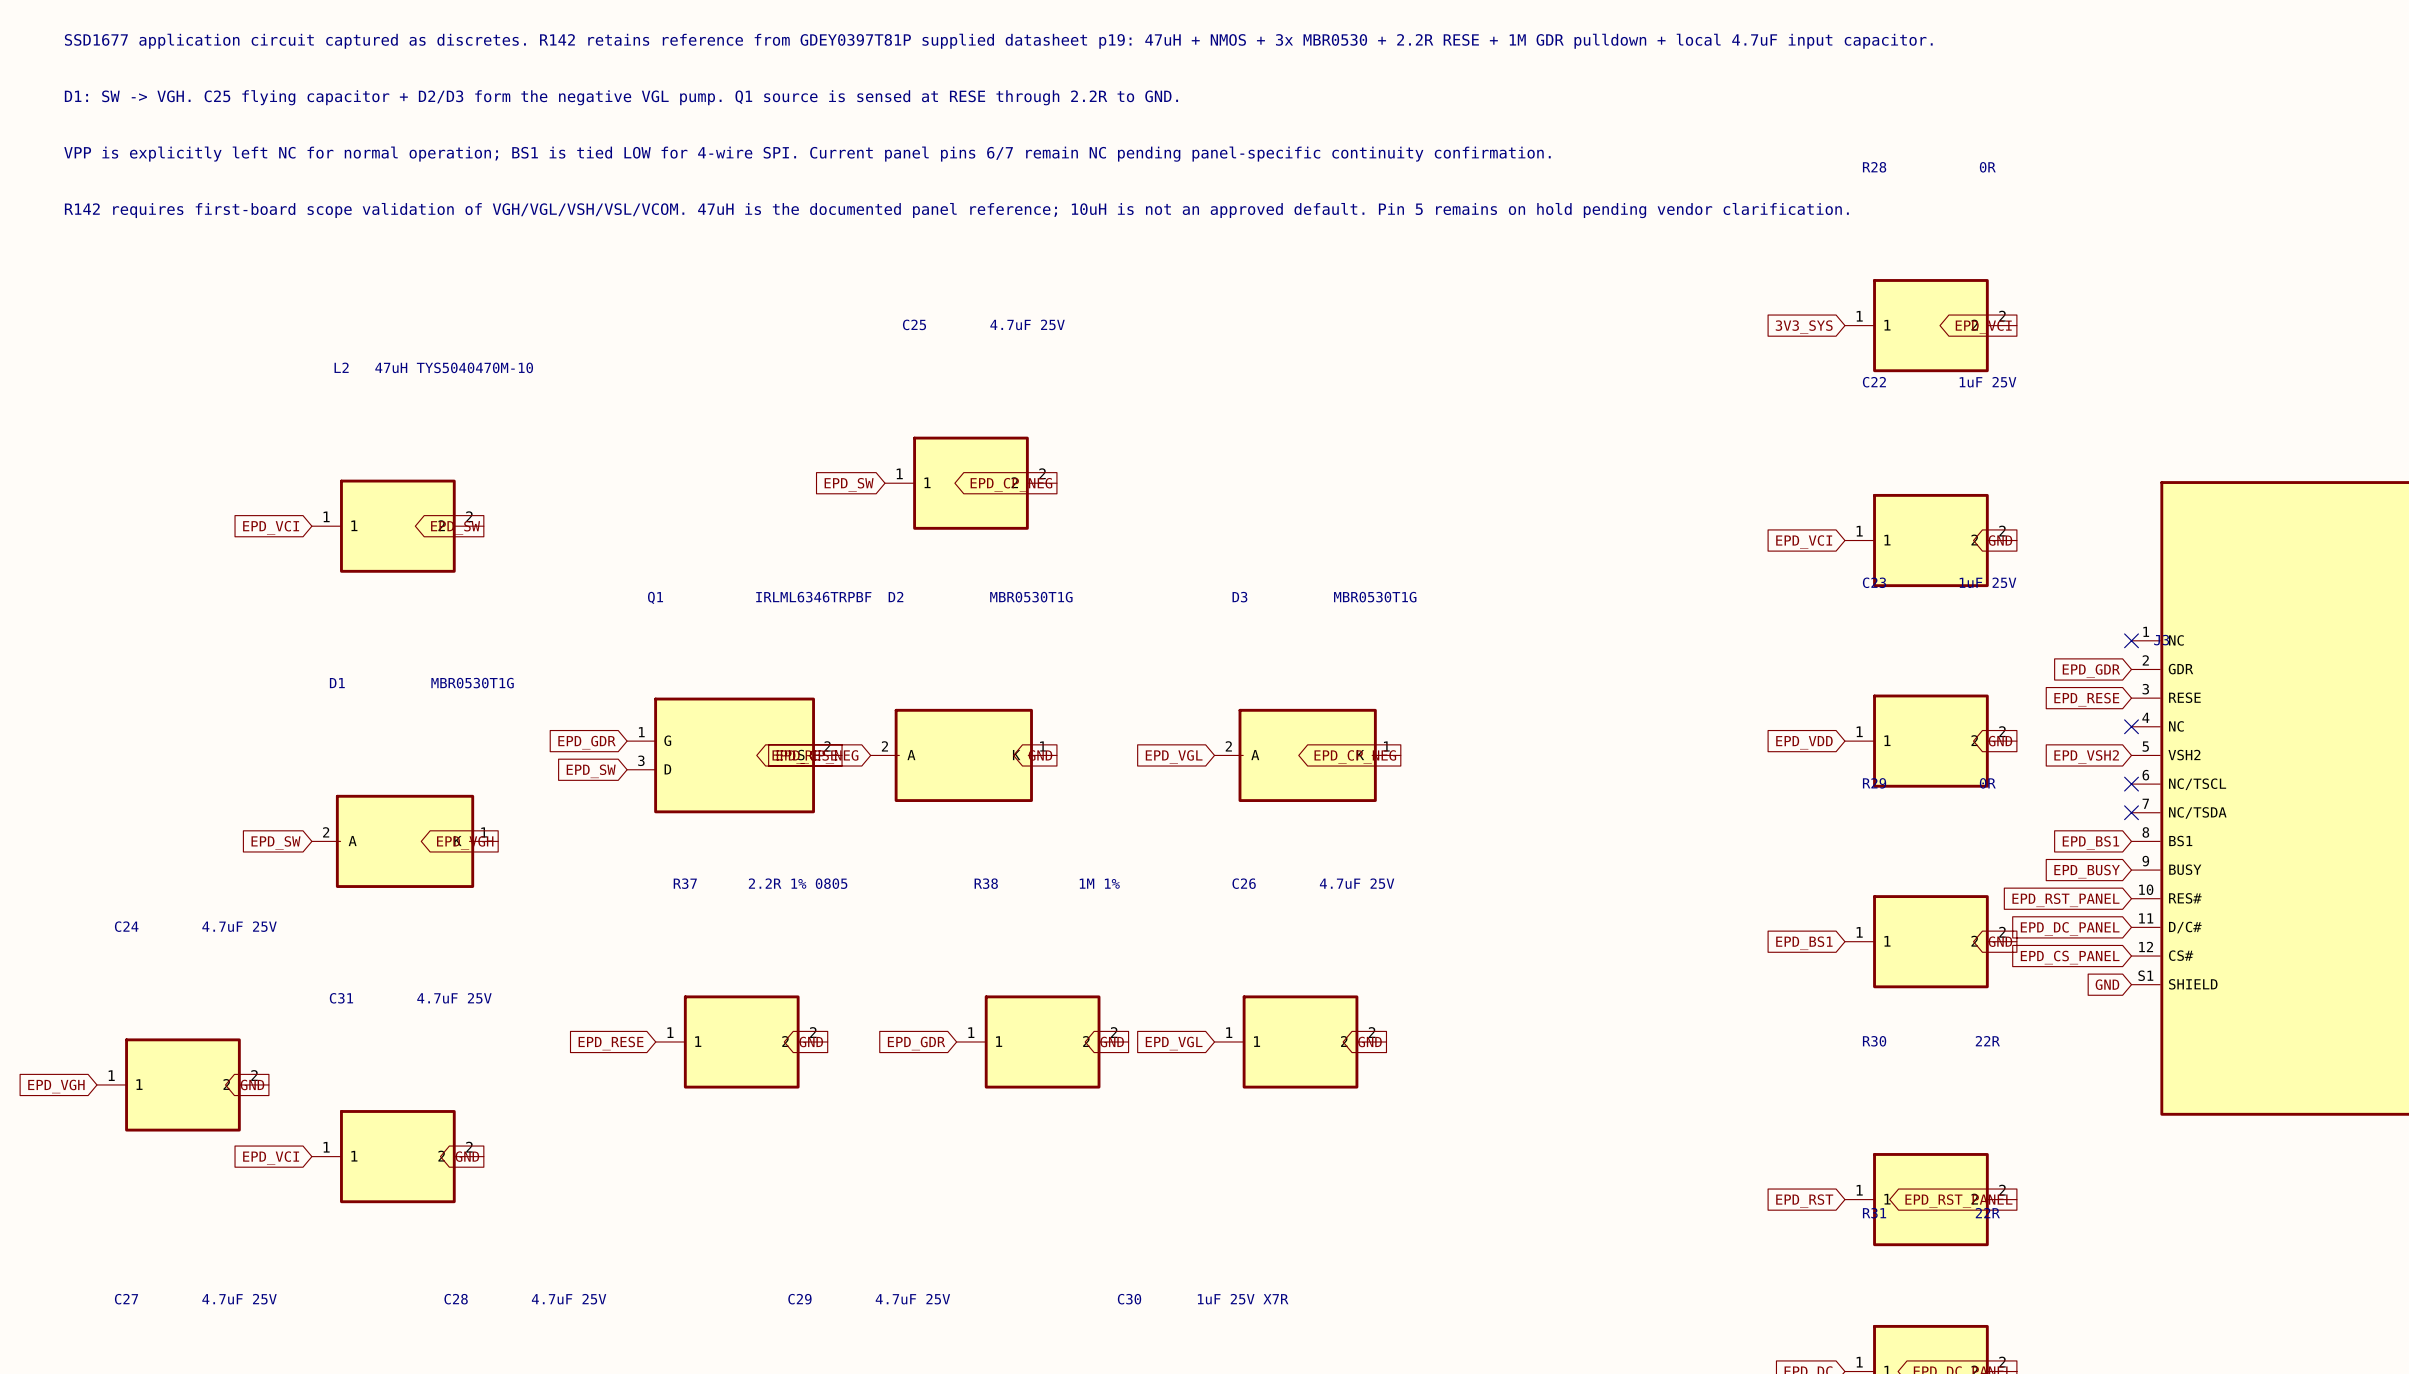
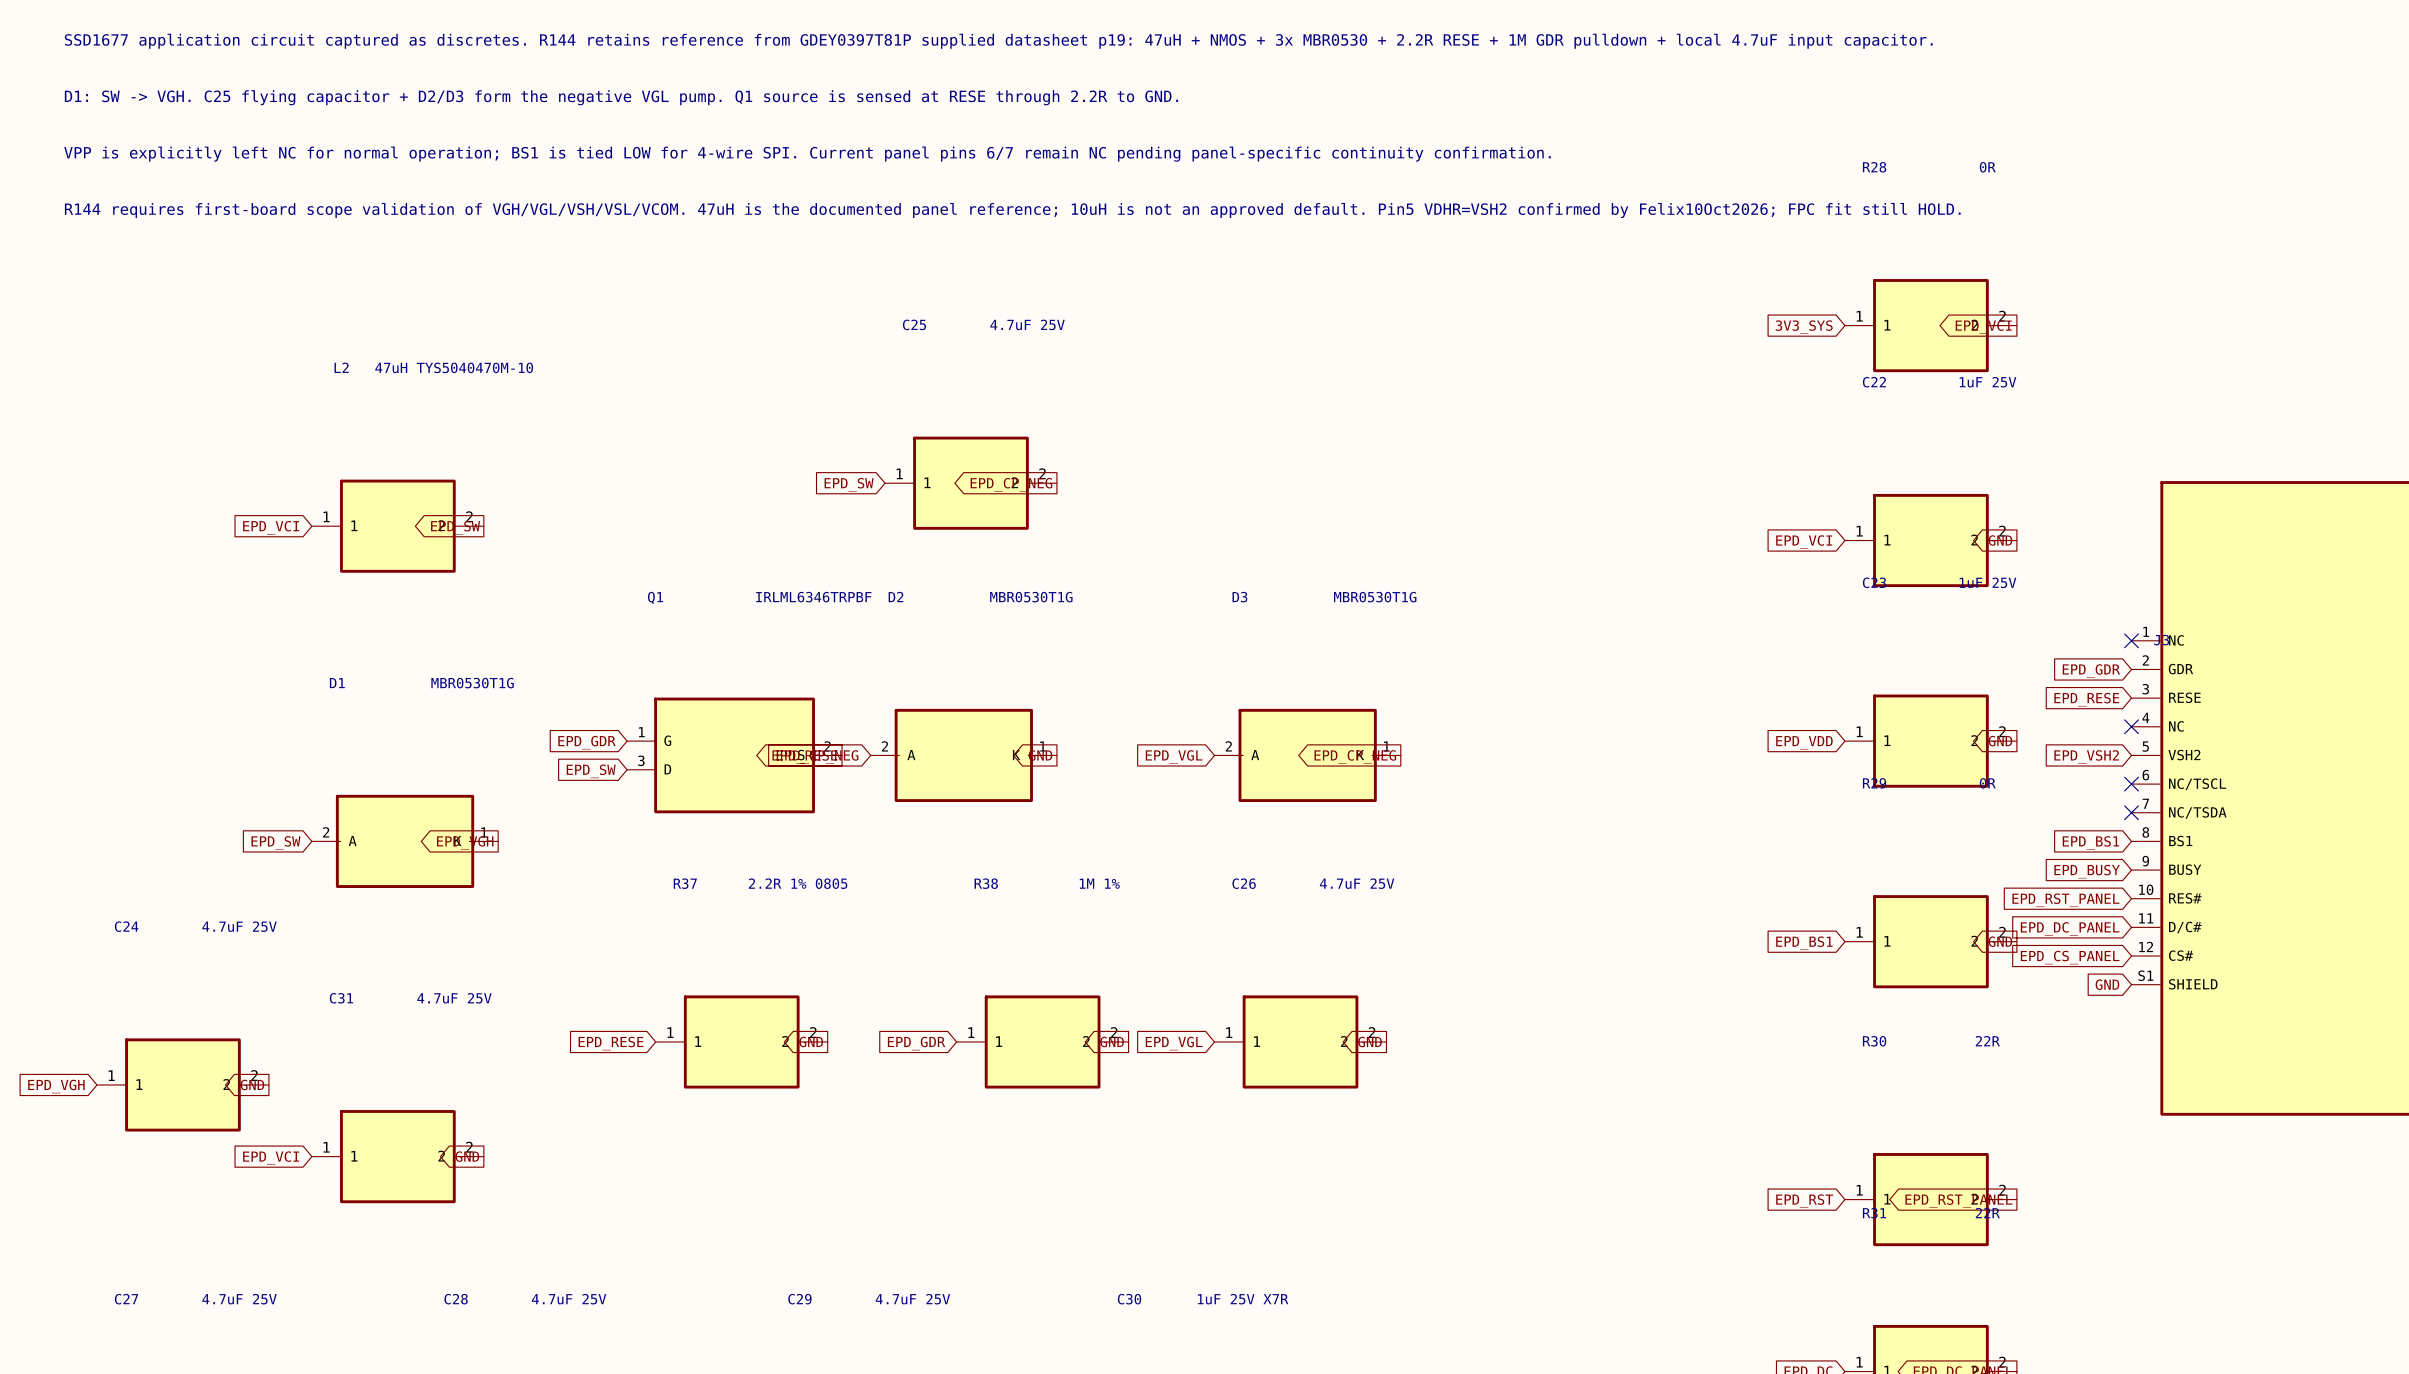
text: SSD1677 application circuit captured as discretes. R142 retains reference from GDEY0397T81P supplied datasheet p19: 47uH + NMOS + 3x MBR0530 + 2.2R RESE + 1M GDR pulldown + local 4.7uF input capacitor. (998, 41) -> SSD1677 application circuit captured as discretes. R144 retains reference from GDEY0397T81P supplied datasheet p19: 47uH + NMOS + 3x MBR0530 + 2.2R RESE + 1M GDR pulldown + local 4.7uF input capacitor. (998, 41)
text: R142 requires first-board scope validation of VGH/VGL/VSH/VSL/VCOM. 47uH is the documented panel reference; 10uH is not an approved default. Pin 5 remains on hold pending vendor clarification. (956, 210) -> R144 requires first-board scope validation of VGH/VGL/VSH/VSL/VCOM. 47uH is the documented panel reference; 10uH is not an approved default. Pin5 VDHR=VSH2 confirmed by Felix10Oct2026; FPC fit still HOLD. (1012, 210)

